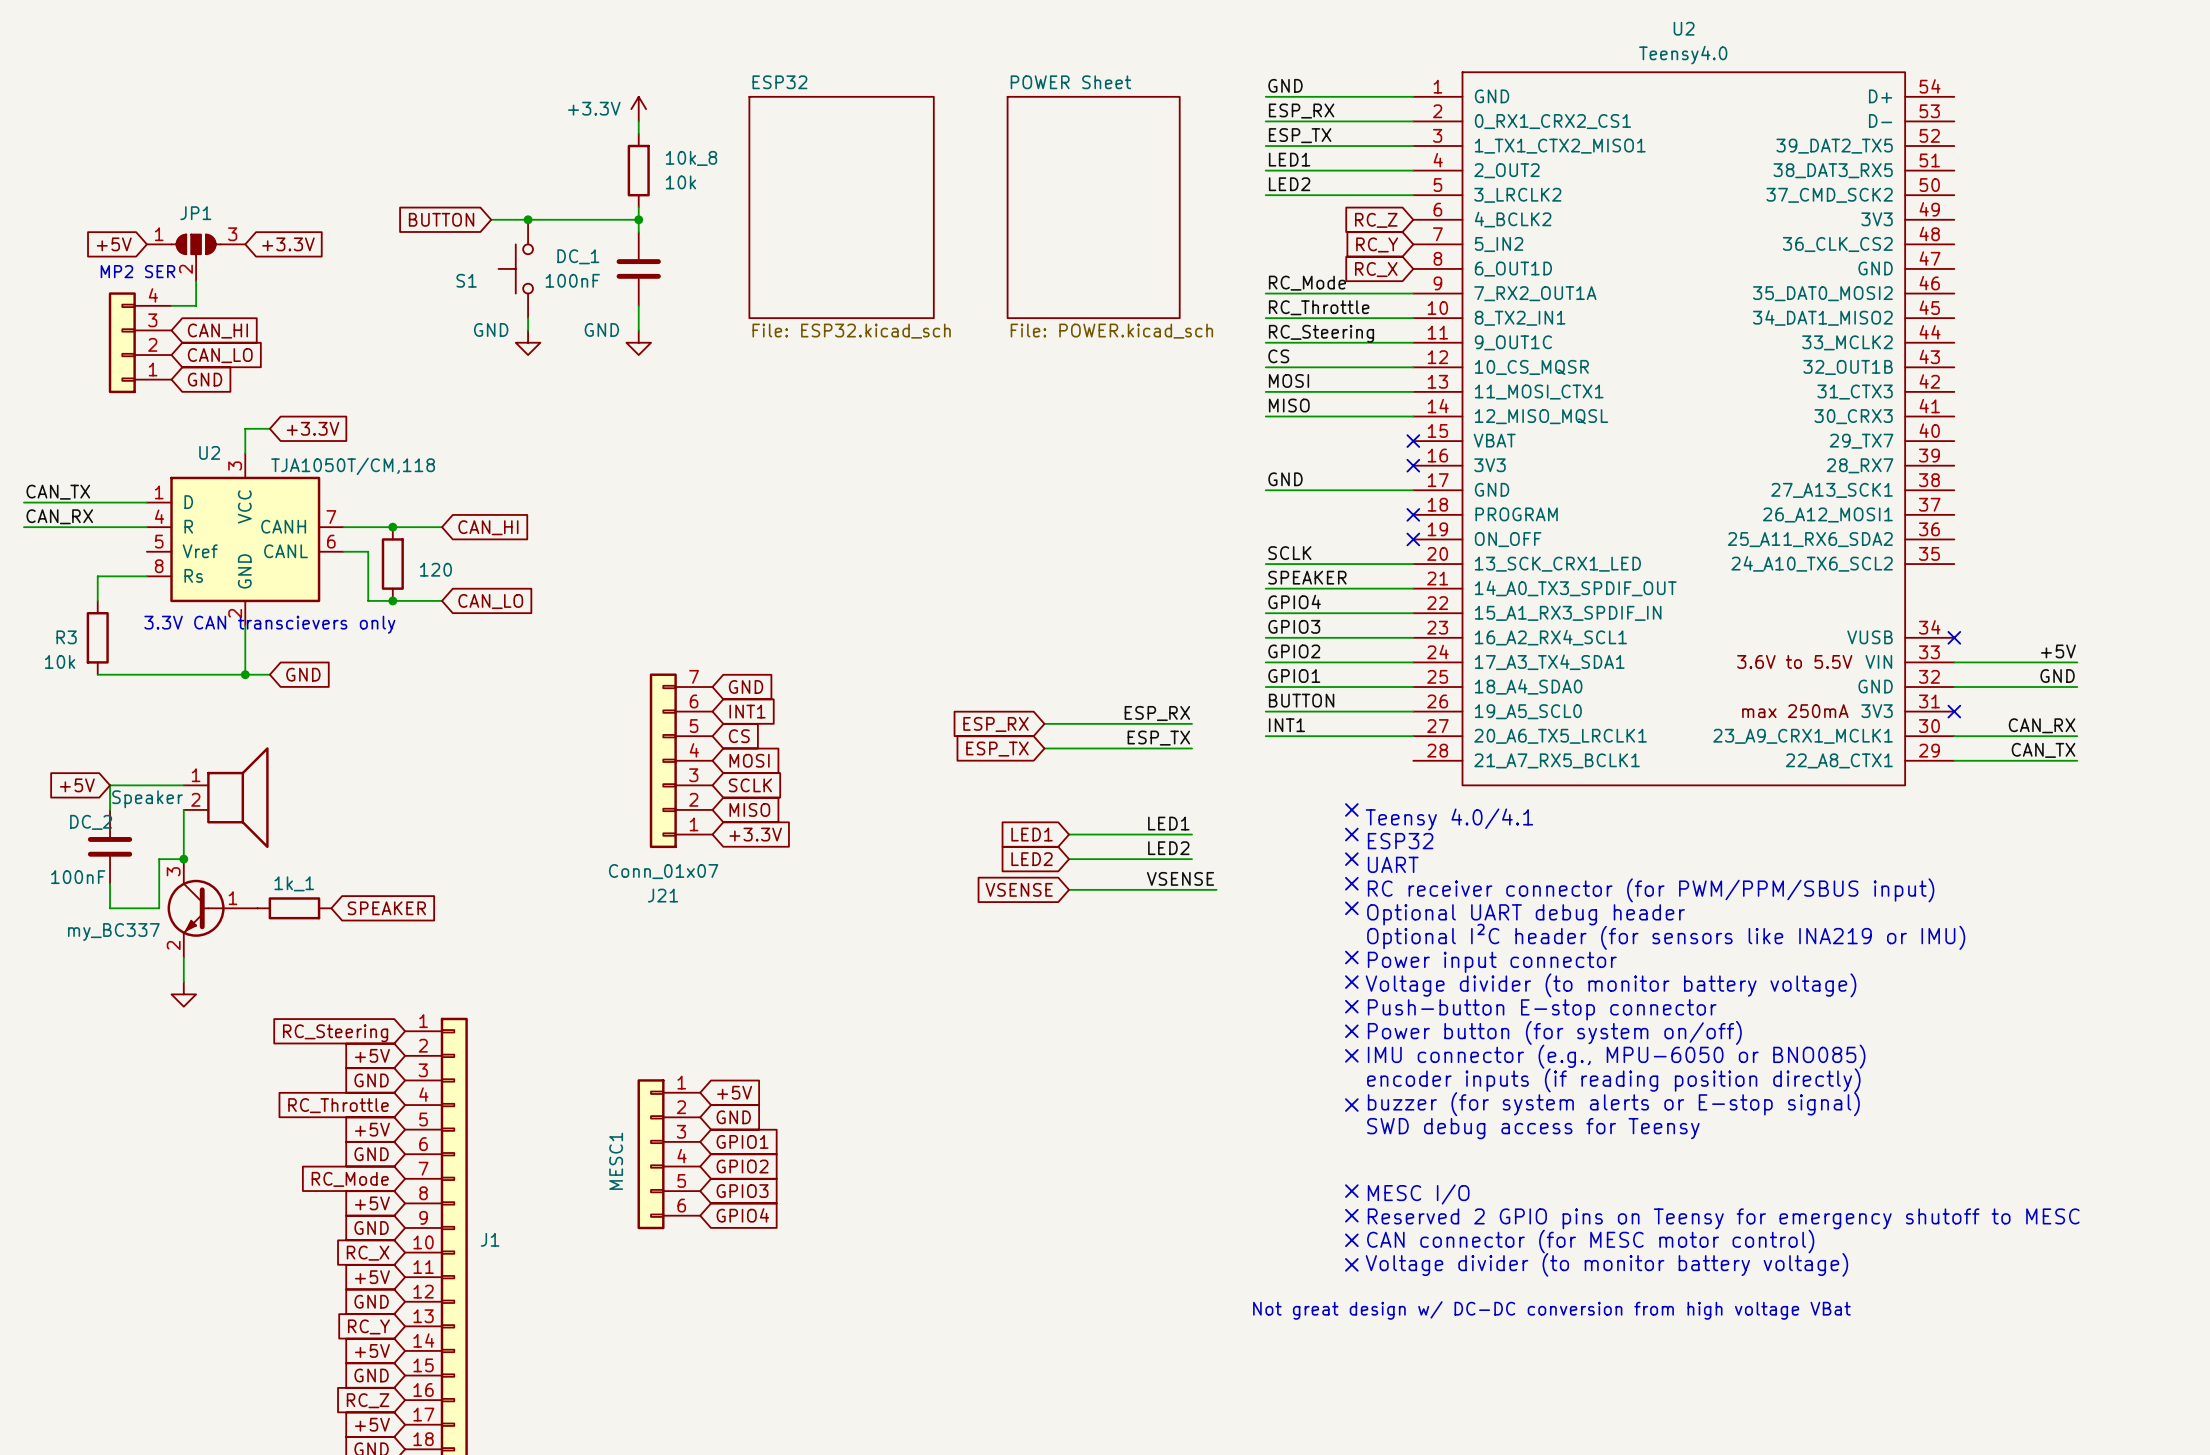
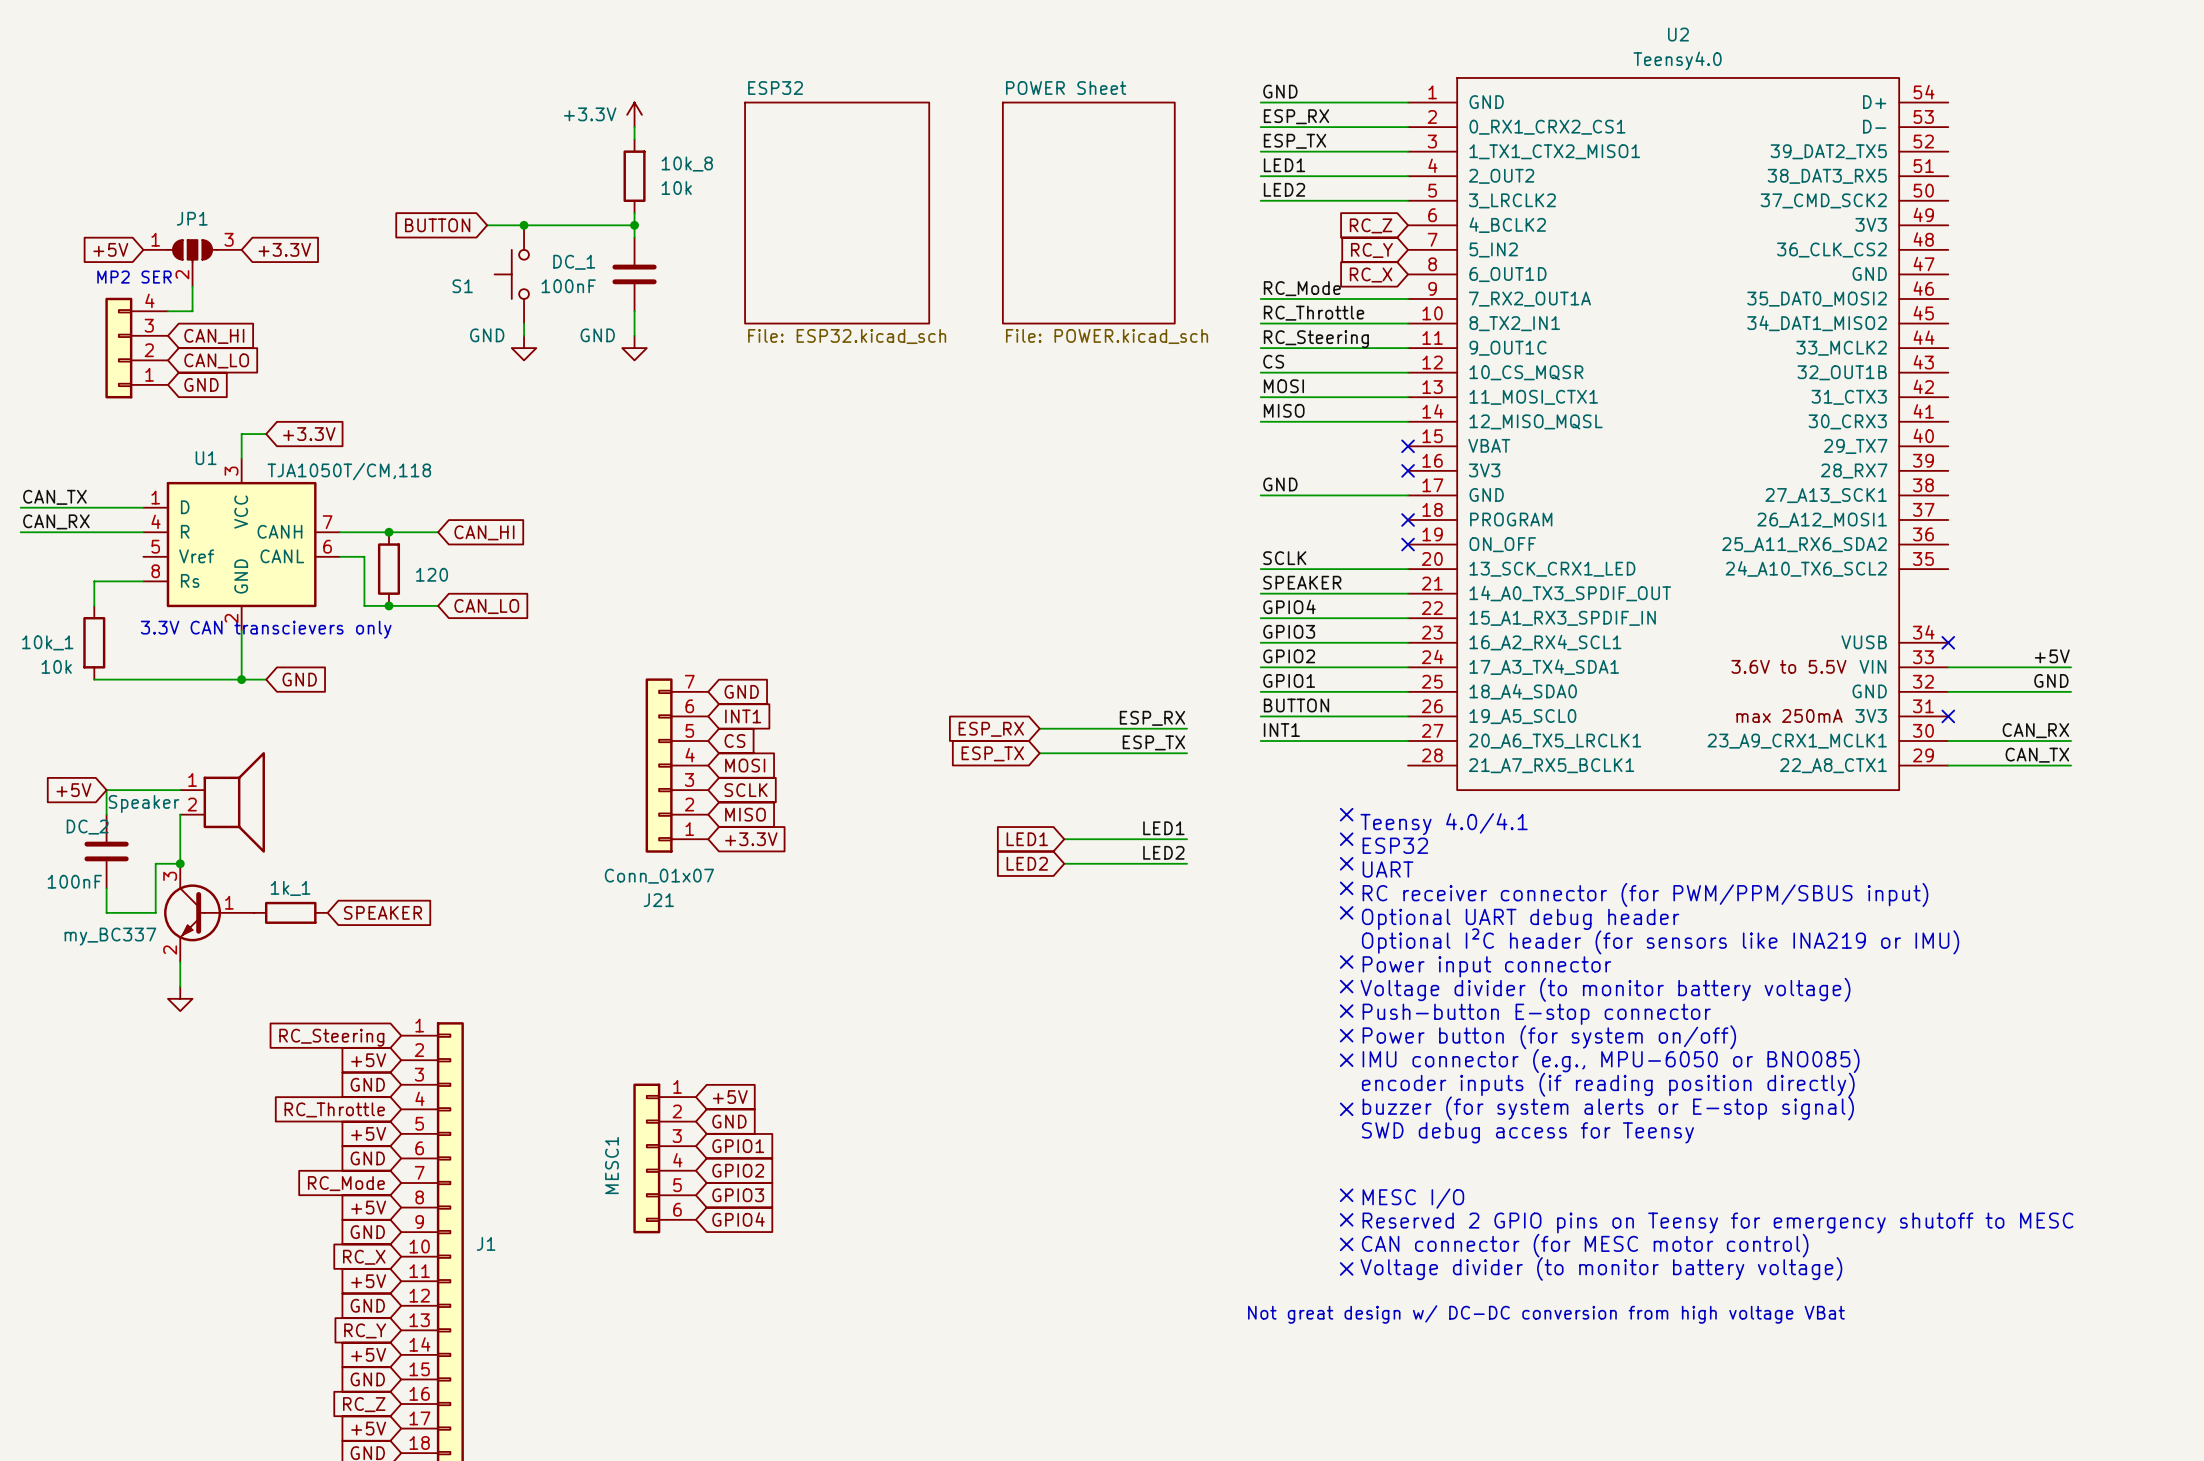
U2 name: U2 (209, 452) -> U1 (206, 458)
R3 name: R3 (66, 637) -> 10k_1 (47, 642)
label: VSENSE (1180, 878) -> none
global label: VSENSE (1019, 889) -> none
wire: (1069, 889) (1216, 889) -> none

